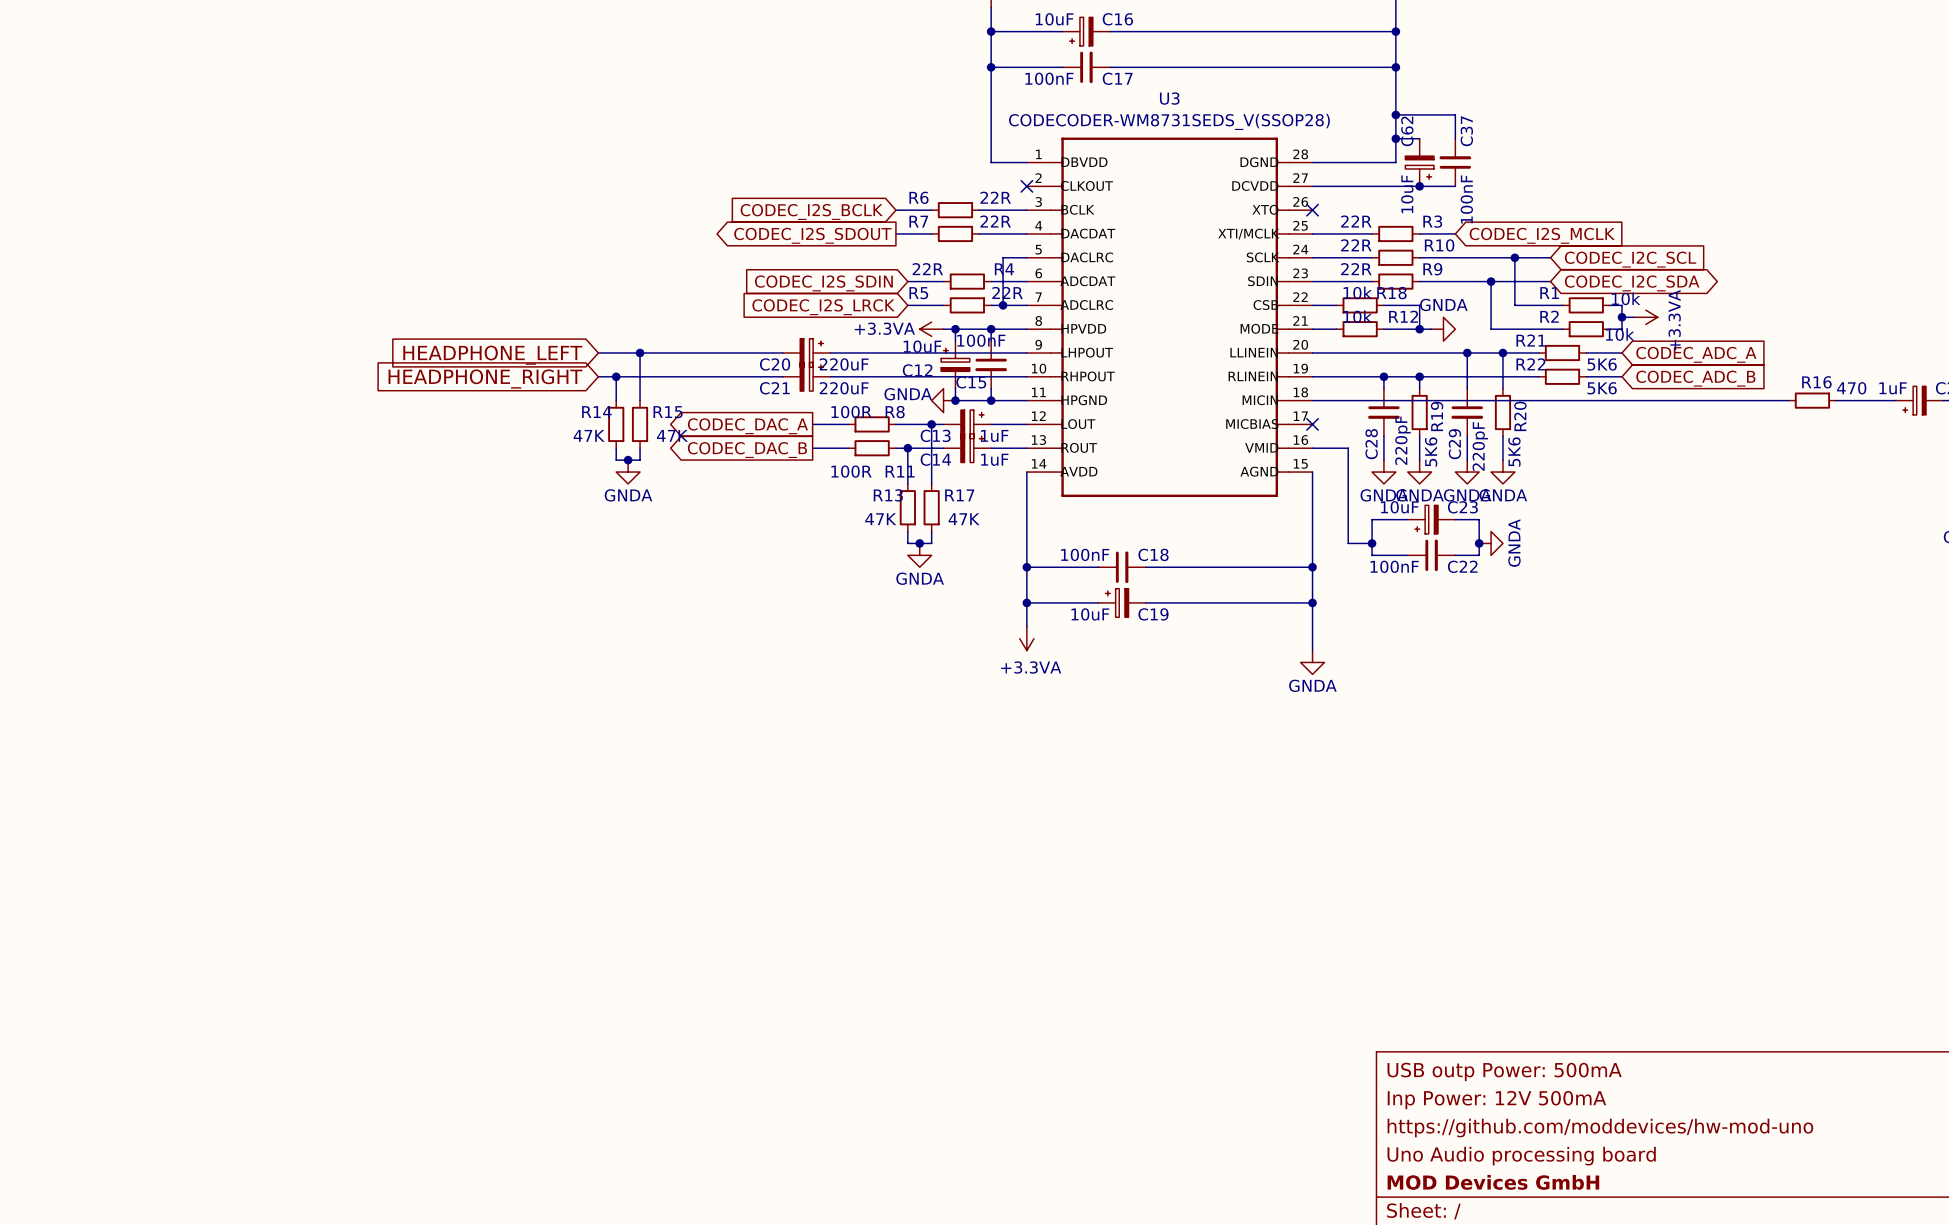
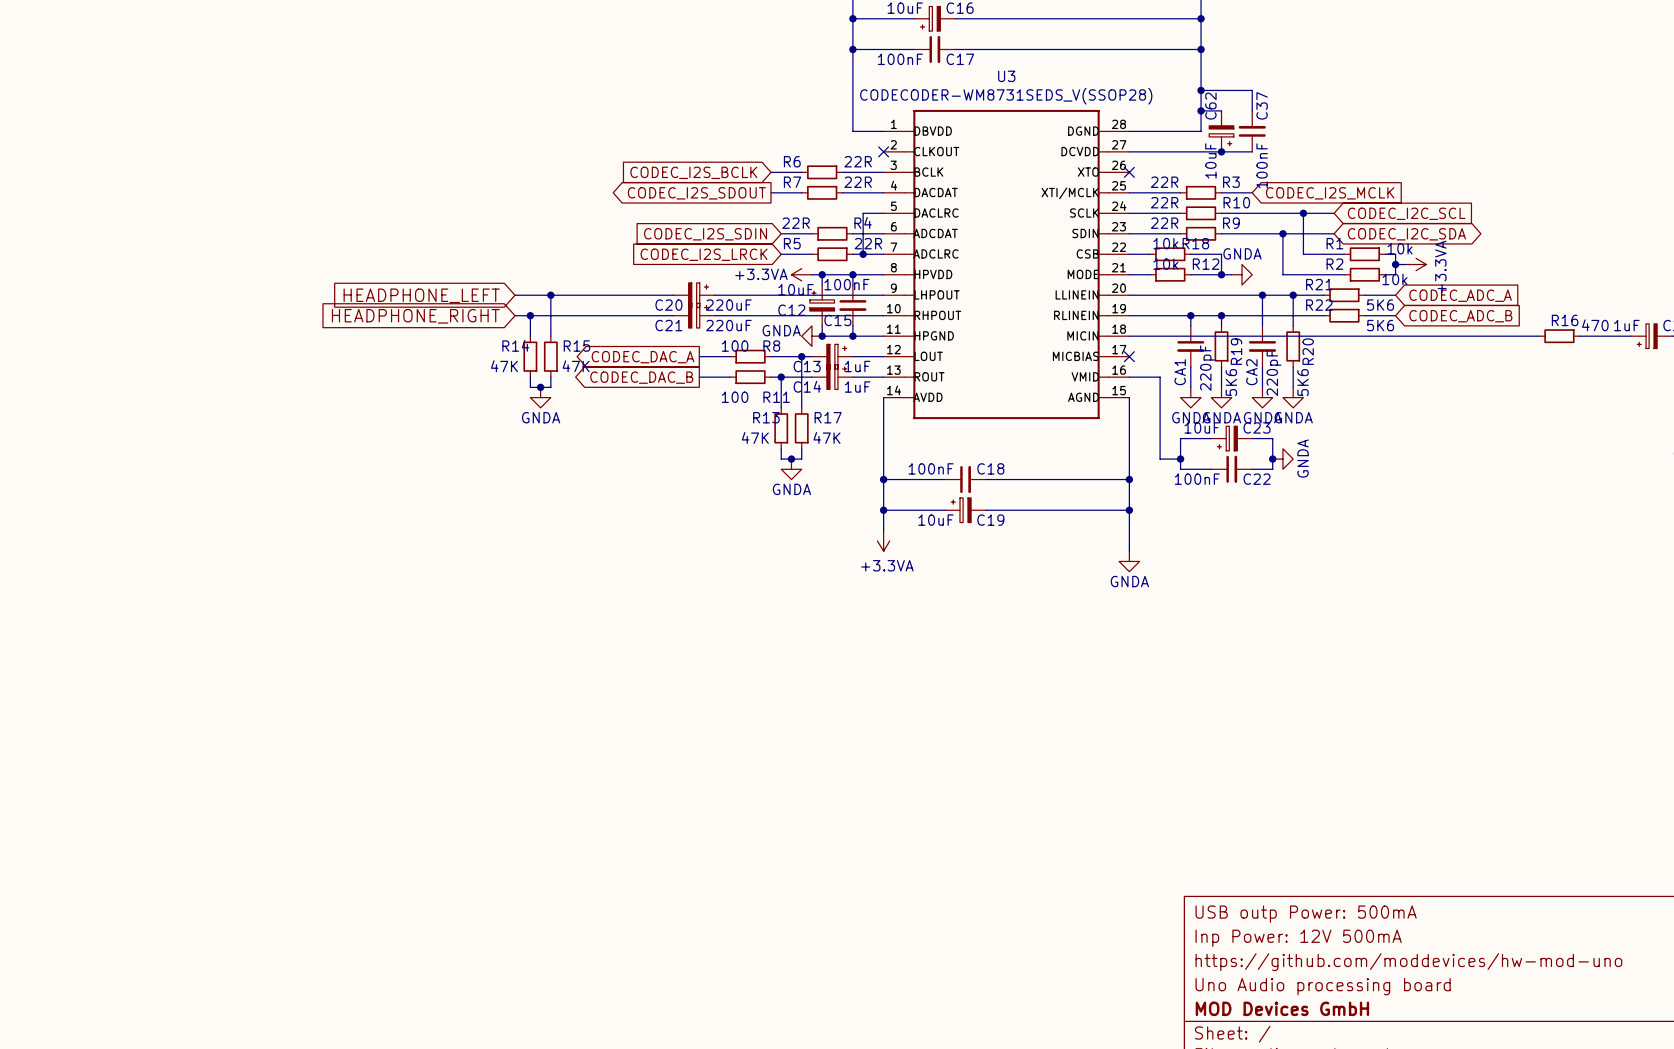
R8 value: 100R (851, 412) -> 100 (735, 346)
C28 name: C28 (1371, 444) -> CA1 (1180, 372)
C29 name: C29 (1454, 444) -> CA2 (1251, 372)
R11 value: 100R (851, 471) -> 100 (735, 397)

